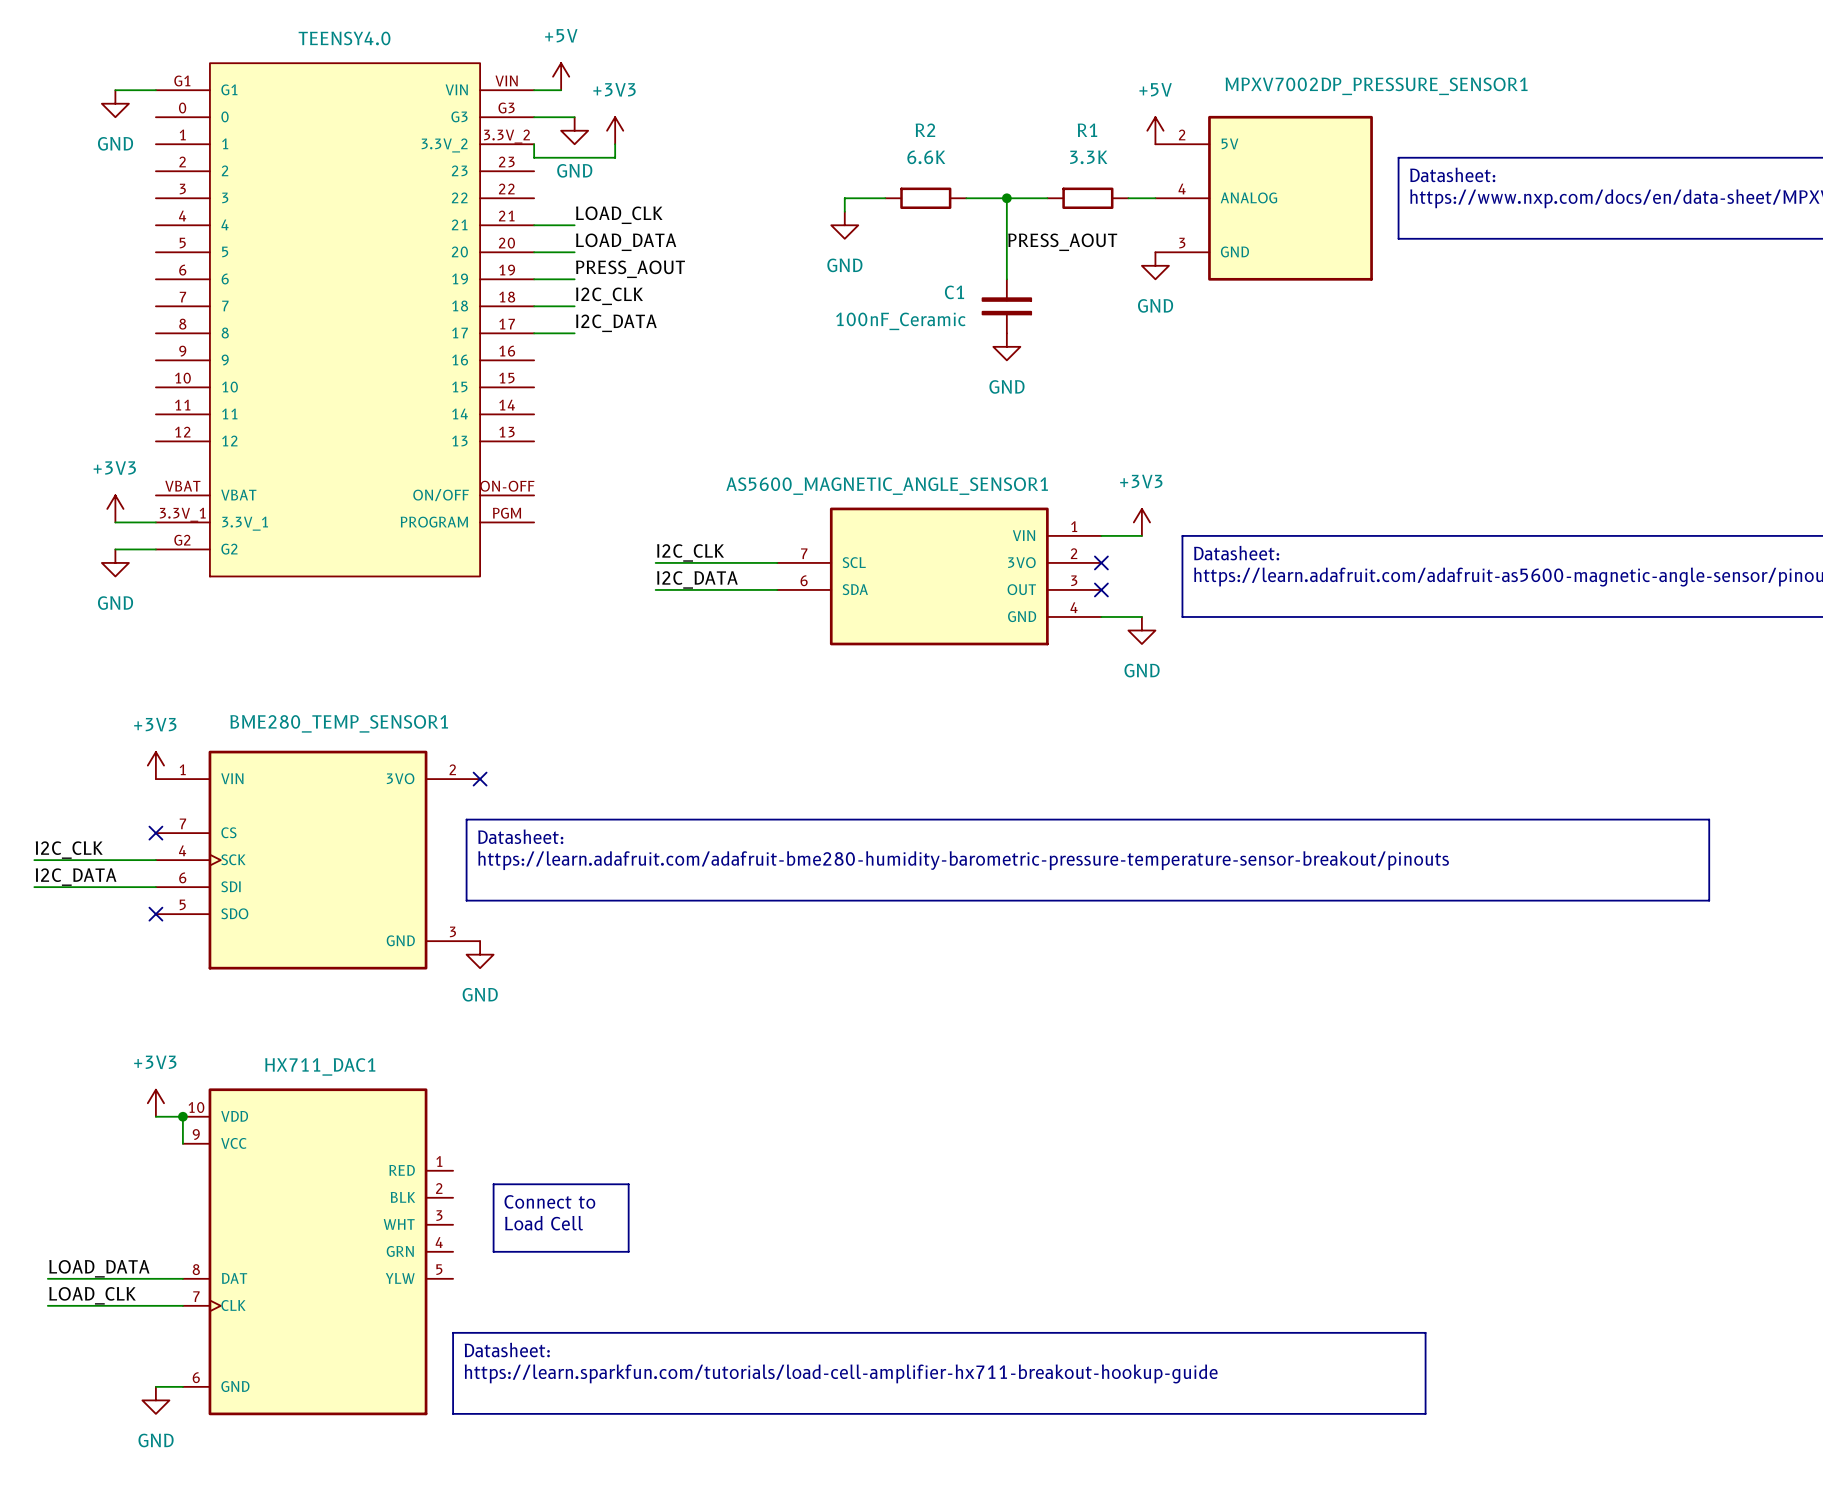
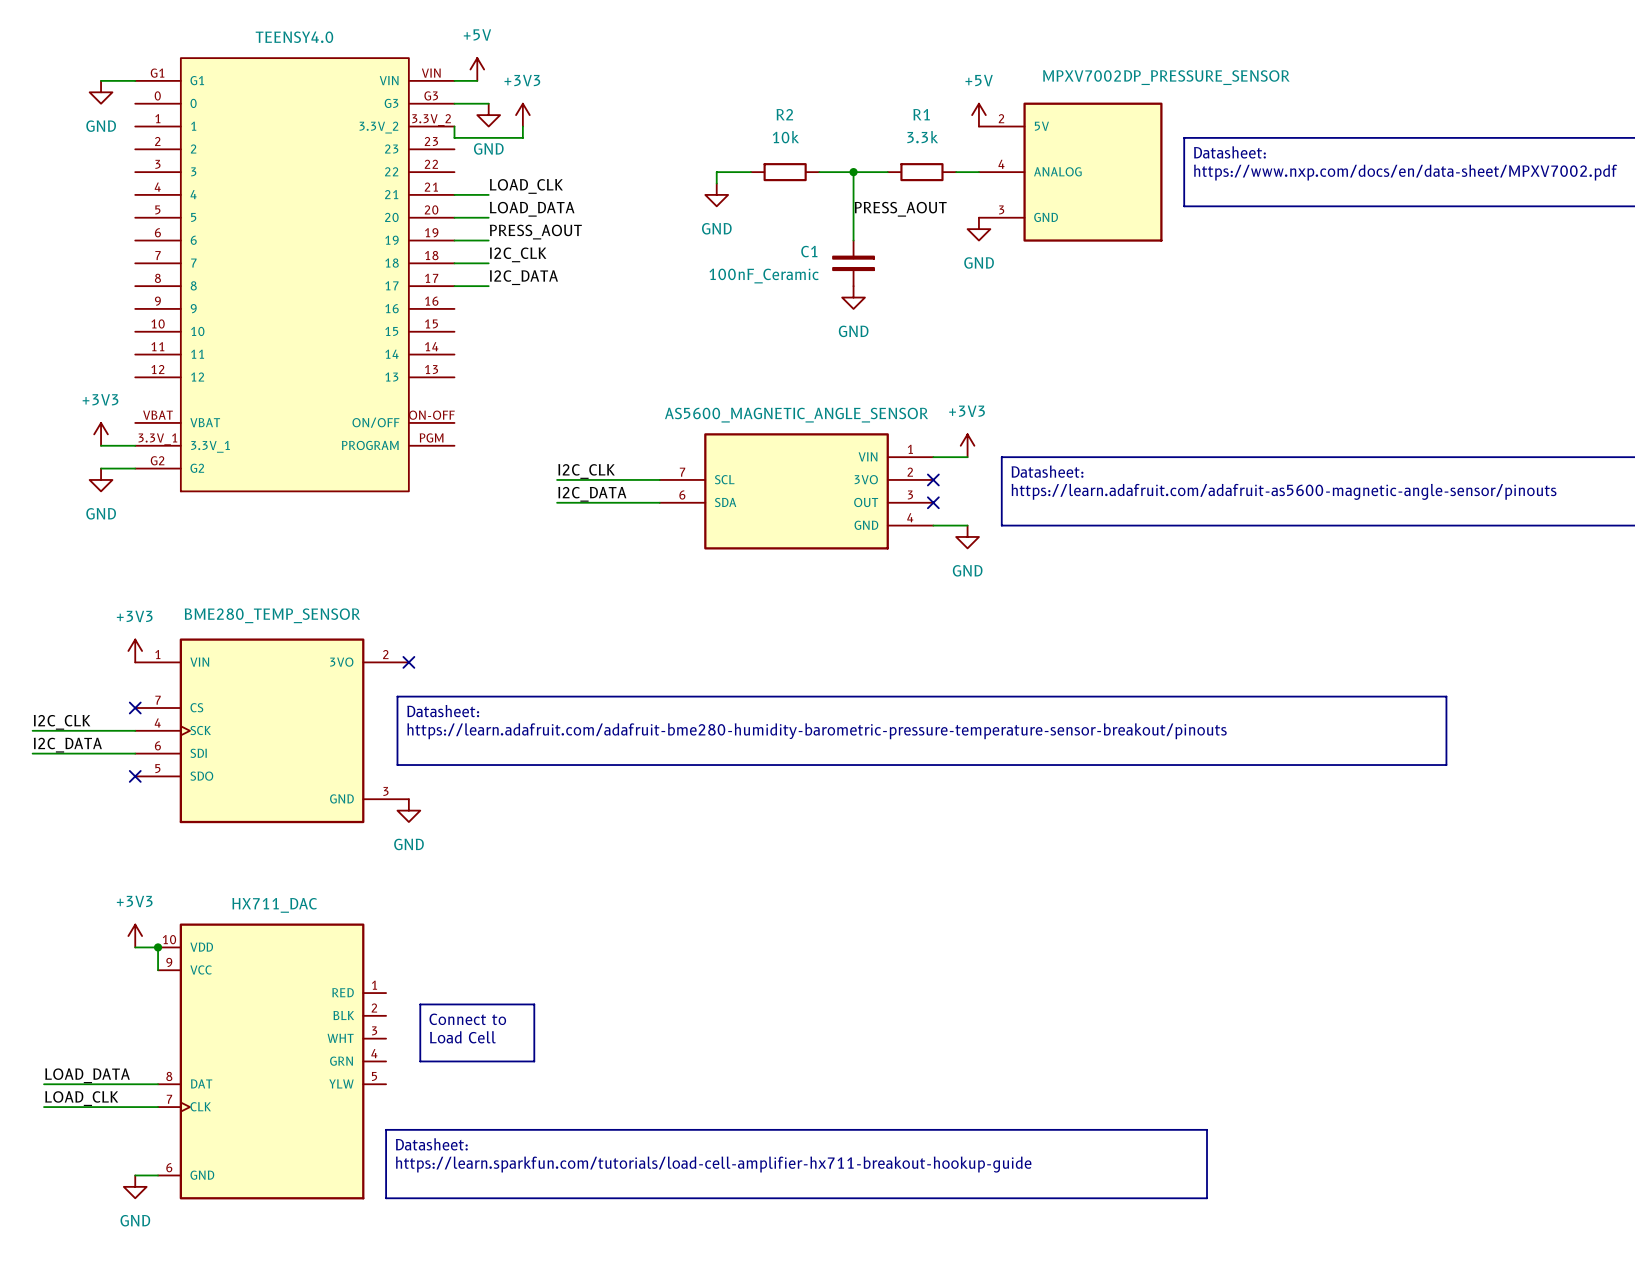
MPXV7002DP_PRESSURE_SENSOR1 name: MPXV7002DP_PRESSURE_SENSOR1 (1376, 86) -> MPXV7002DP_PRESSURE_SENSOR (1166, 77)
R2 value: 6.6K (926, 157) -> 10k (785, 137)
R1 value: 3.3K (1088, 157) -> 3.3k (922, 137)
AS5600_MAGNETIC_ANGLE_SENSOR1 name: AS5600_MAGNETIC_ANGLE_SENSOR1 (887, 486) -> AS5600_MAGNETIC_ANGLE_SENSOR (796, 415)
BME280_TEMP_SENSOR1 name: BME280_TEMP_SENSOR1 (339, 723) -> BME280_TEMP_SENSOR (272, 615)
HX711_DAC1 name: HX711_DAC1 (320, 1066) -> HX711_DAC (274, 905)

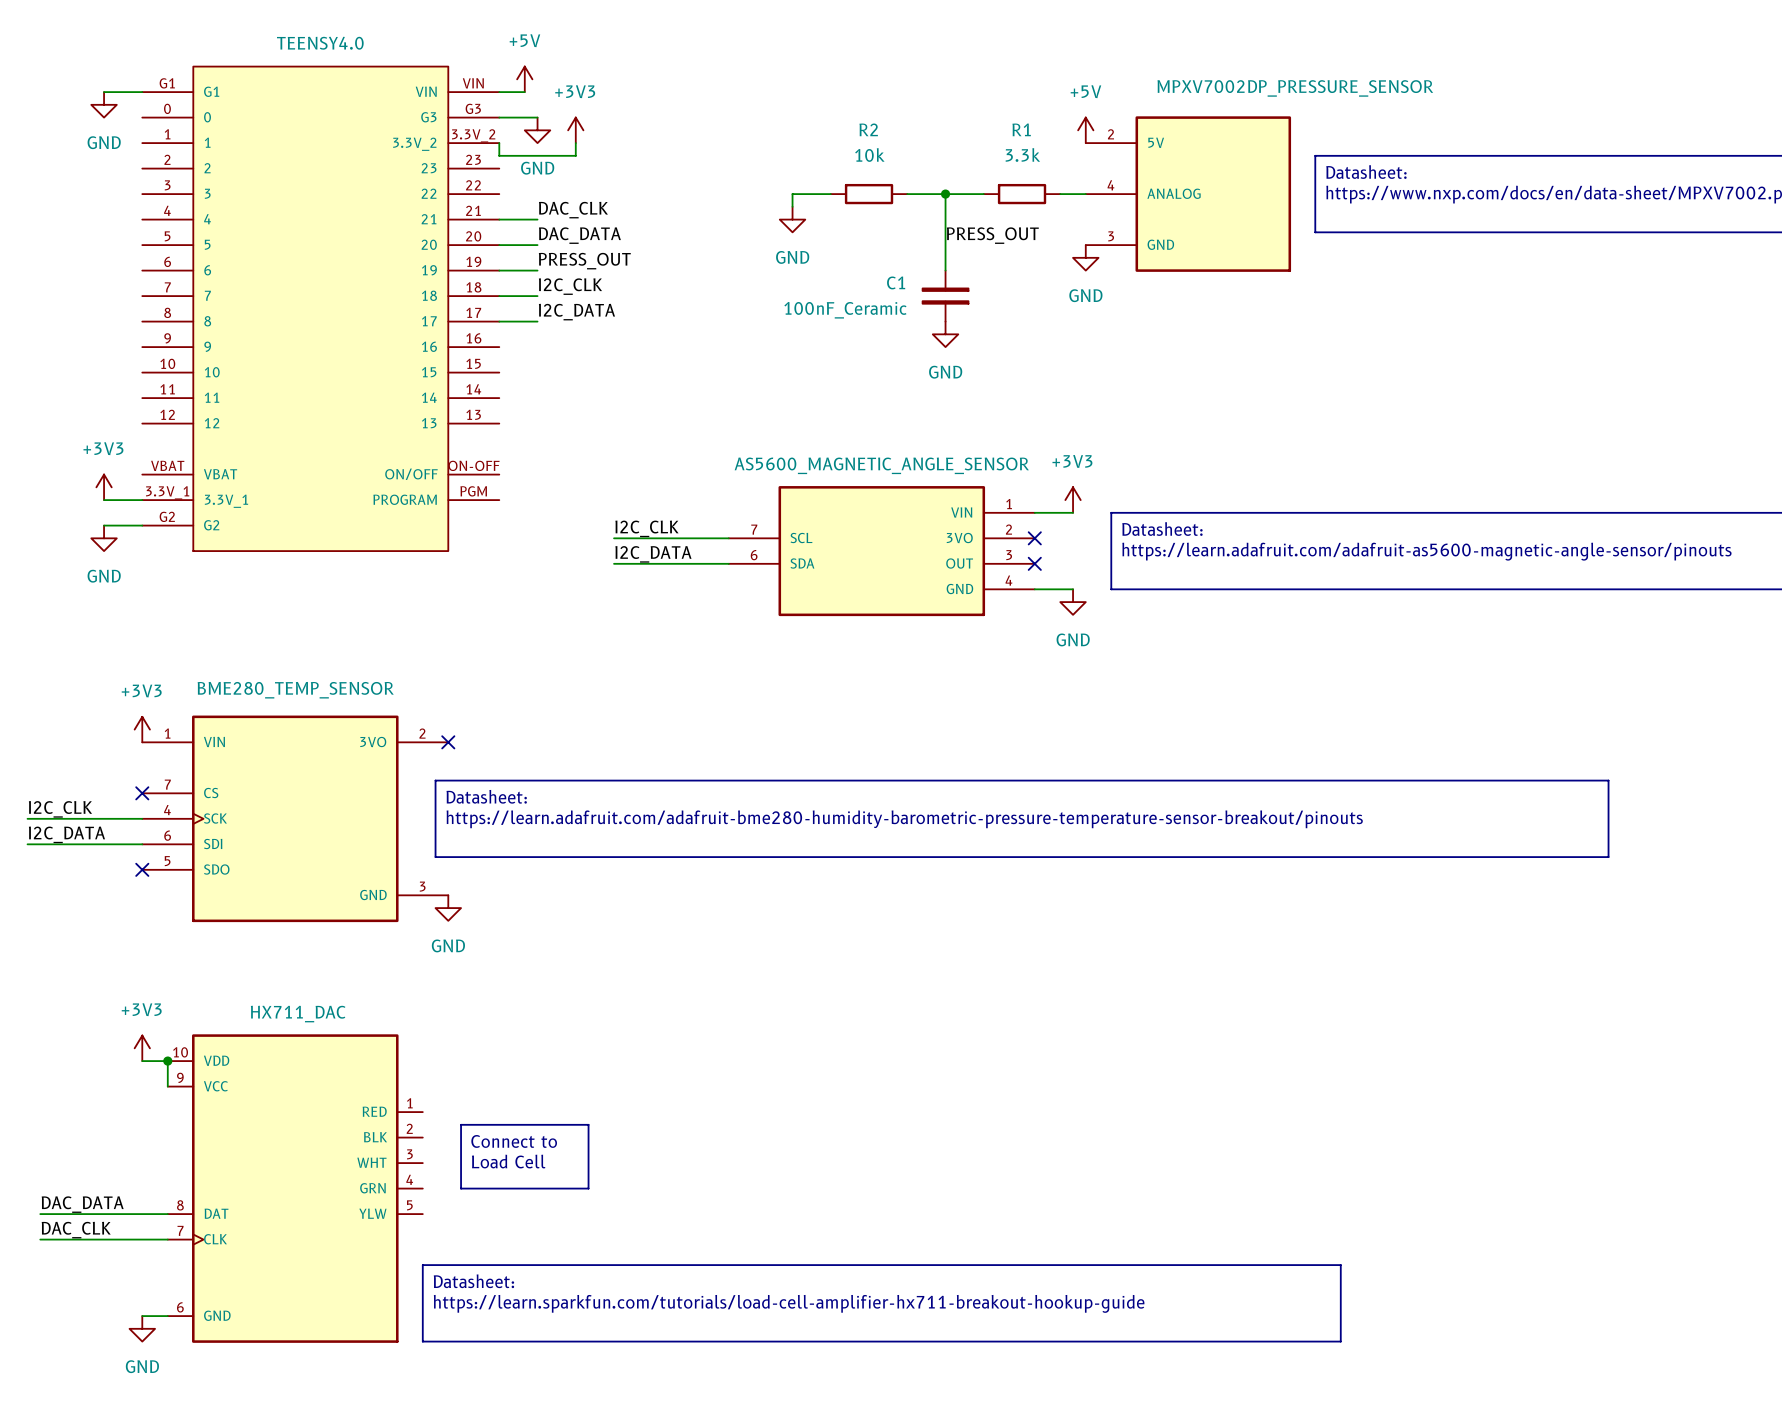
label: LOAD_CLK (526, 186) -> DAC_CLK (573, 210)
label: LOAD_DATA (532, 209) -> DAC_DATA (579, 235)
label: PRESS_AOUT (900, 209) -> PRESS_OUT (992, 235)
label: PRESS_AOUT (535, 232) -> PRESS_OUT (584, 261)
label: LOAD_DATA (87, 1075) -> DAC_DATA (82, 1204)
label: LOAD_CLK (81, 1098) -> DAC_CLK (76, 1230)

